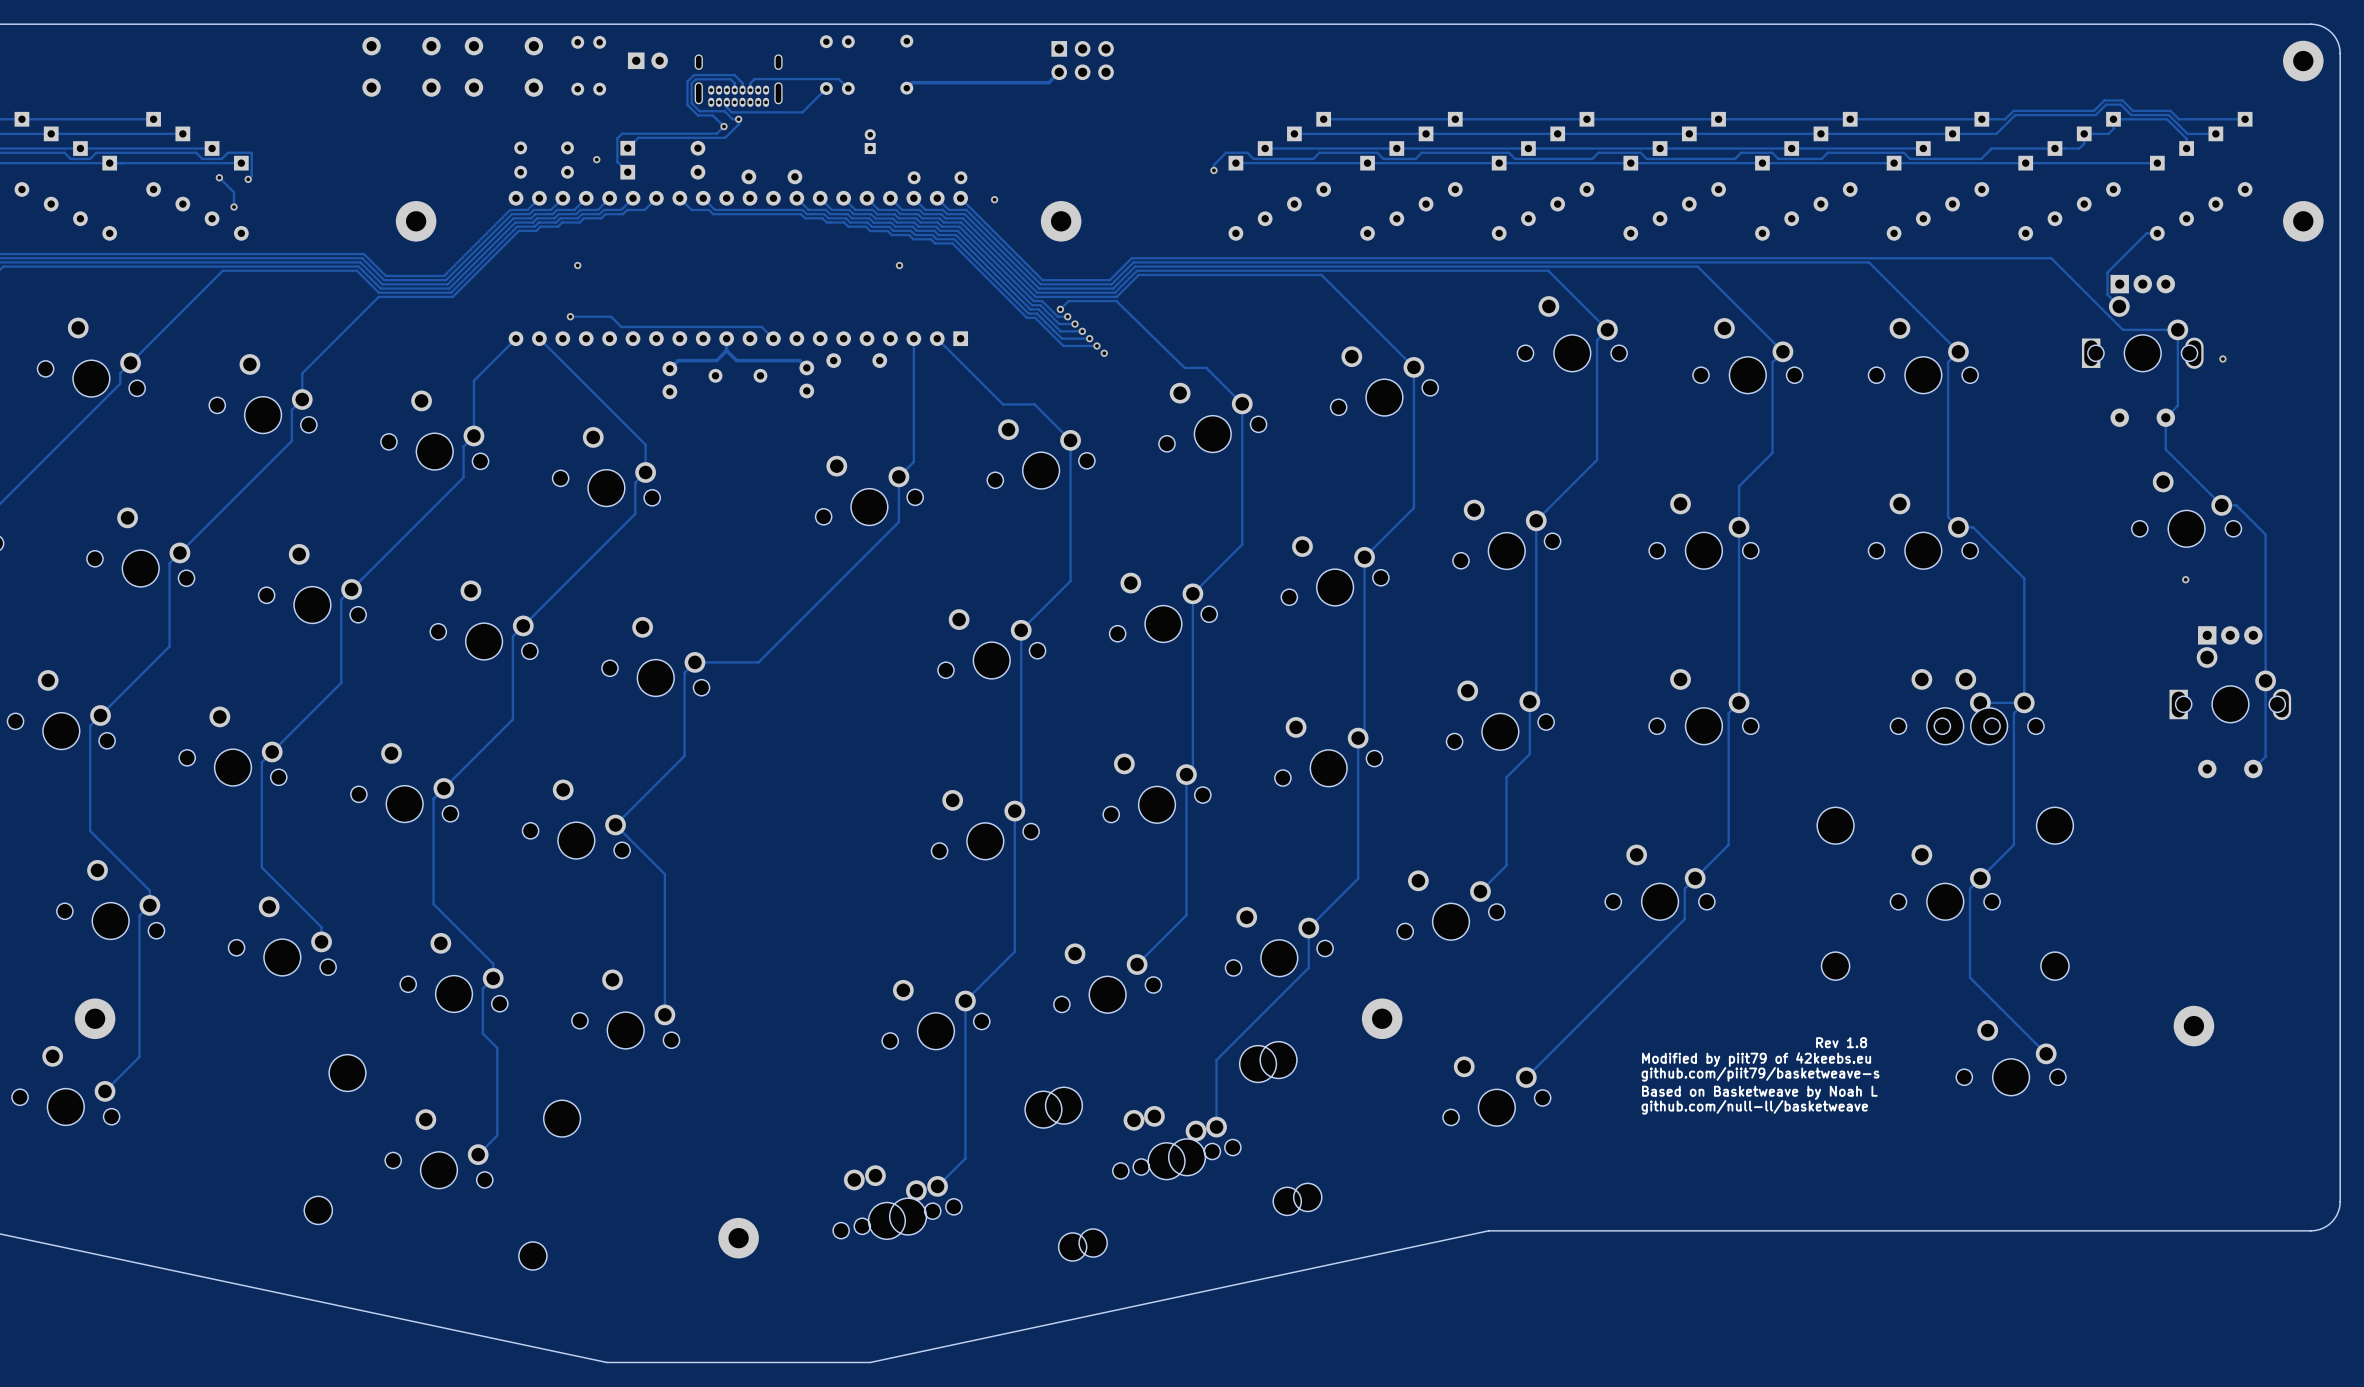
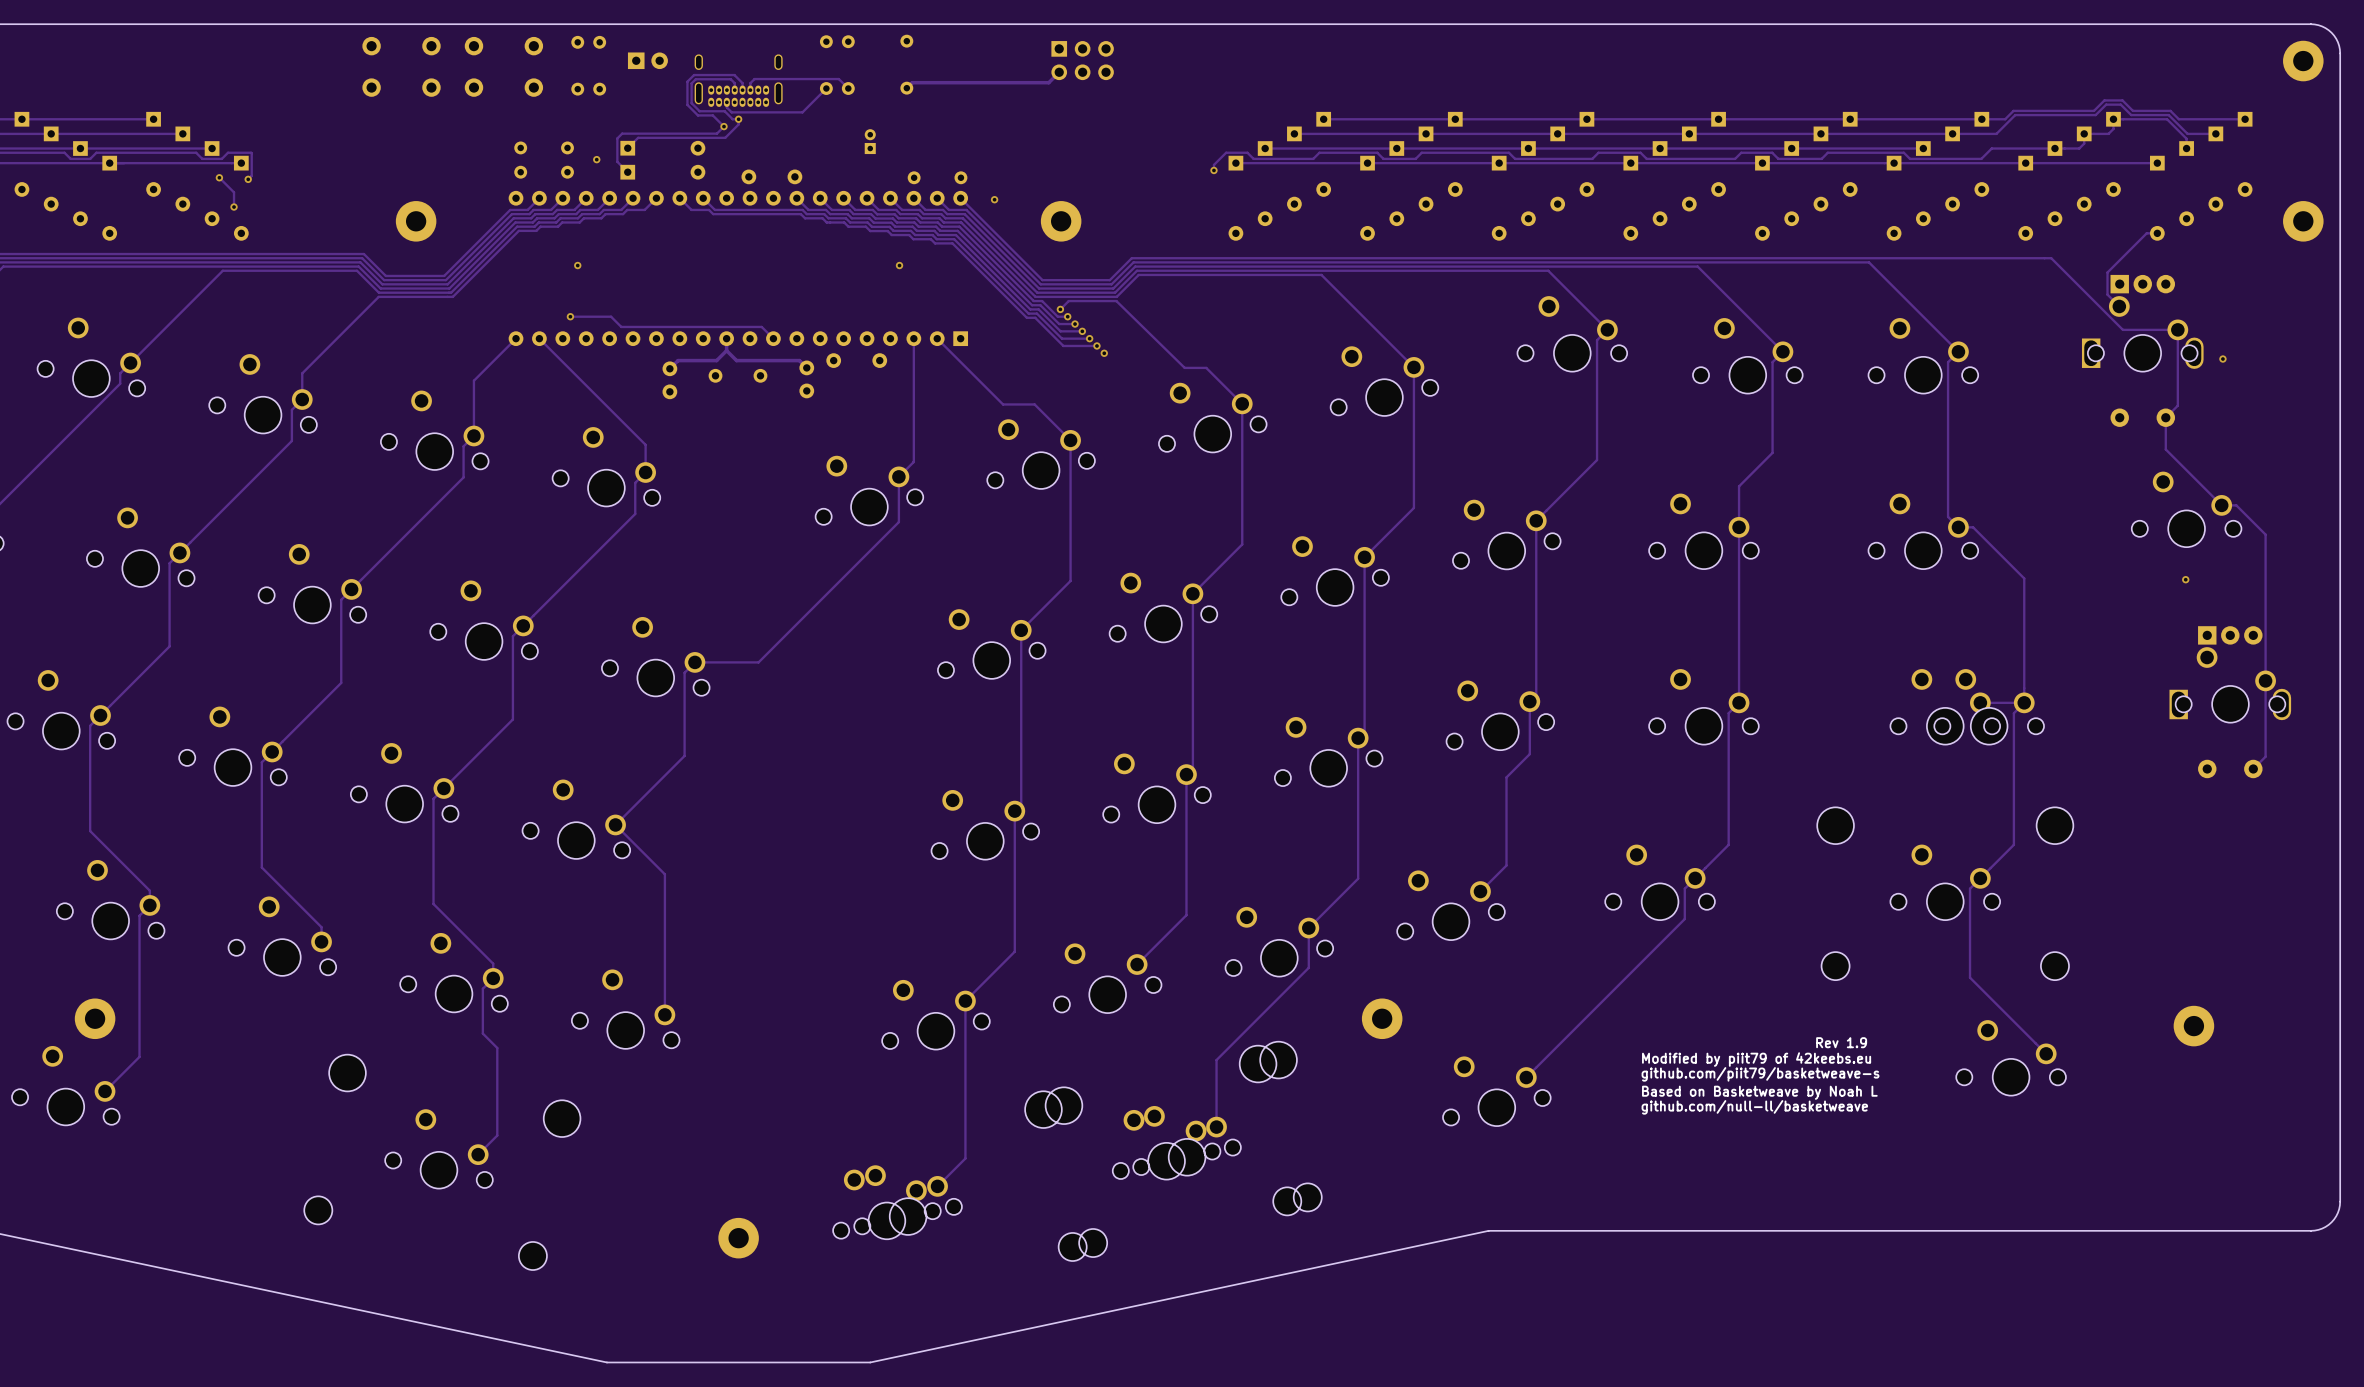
text: Rev 1.8 (1841, 1042) -> Rev 1.9 (1841, 1042)

